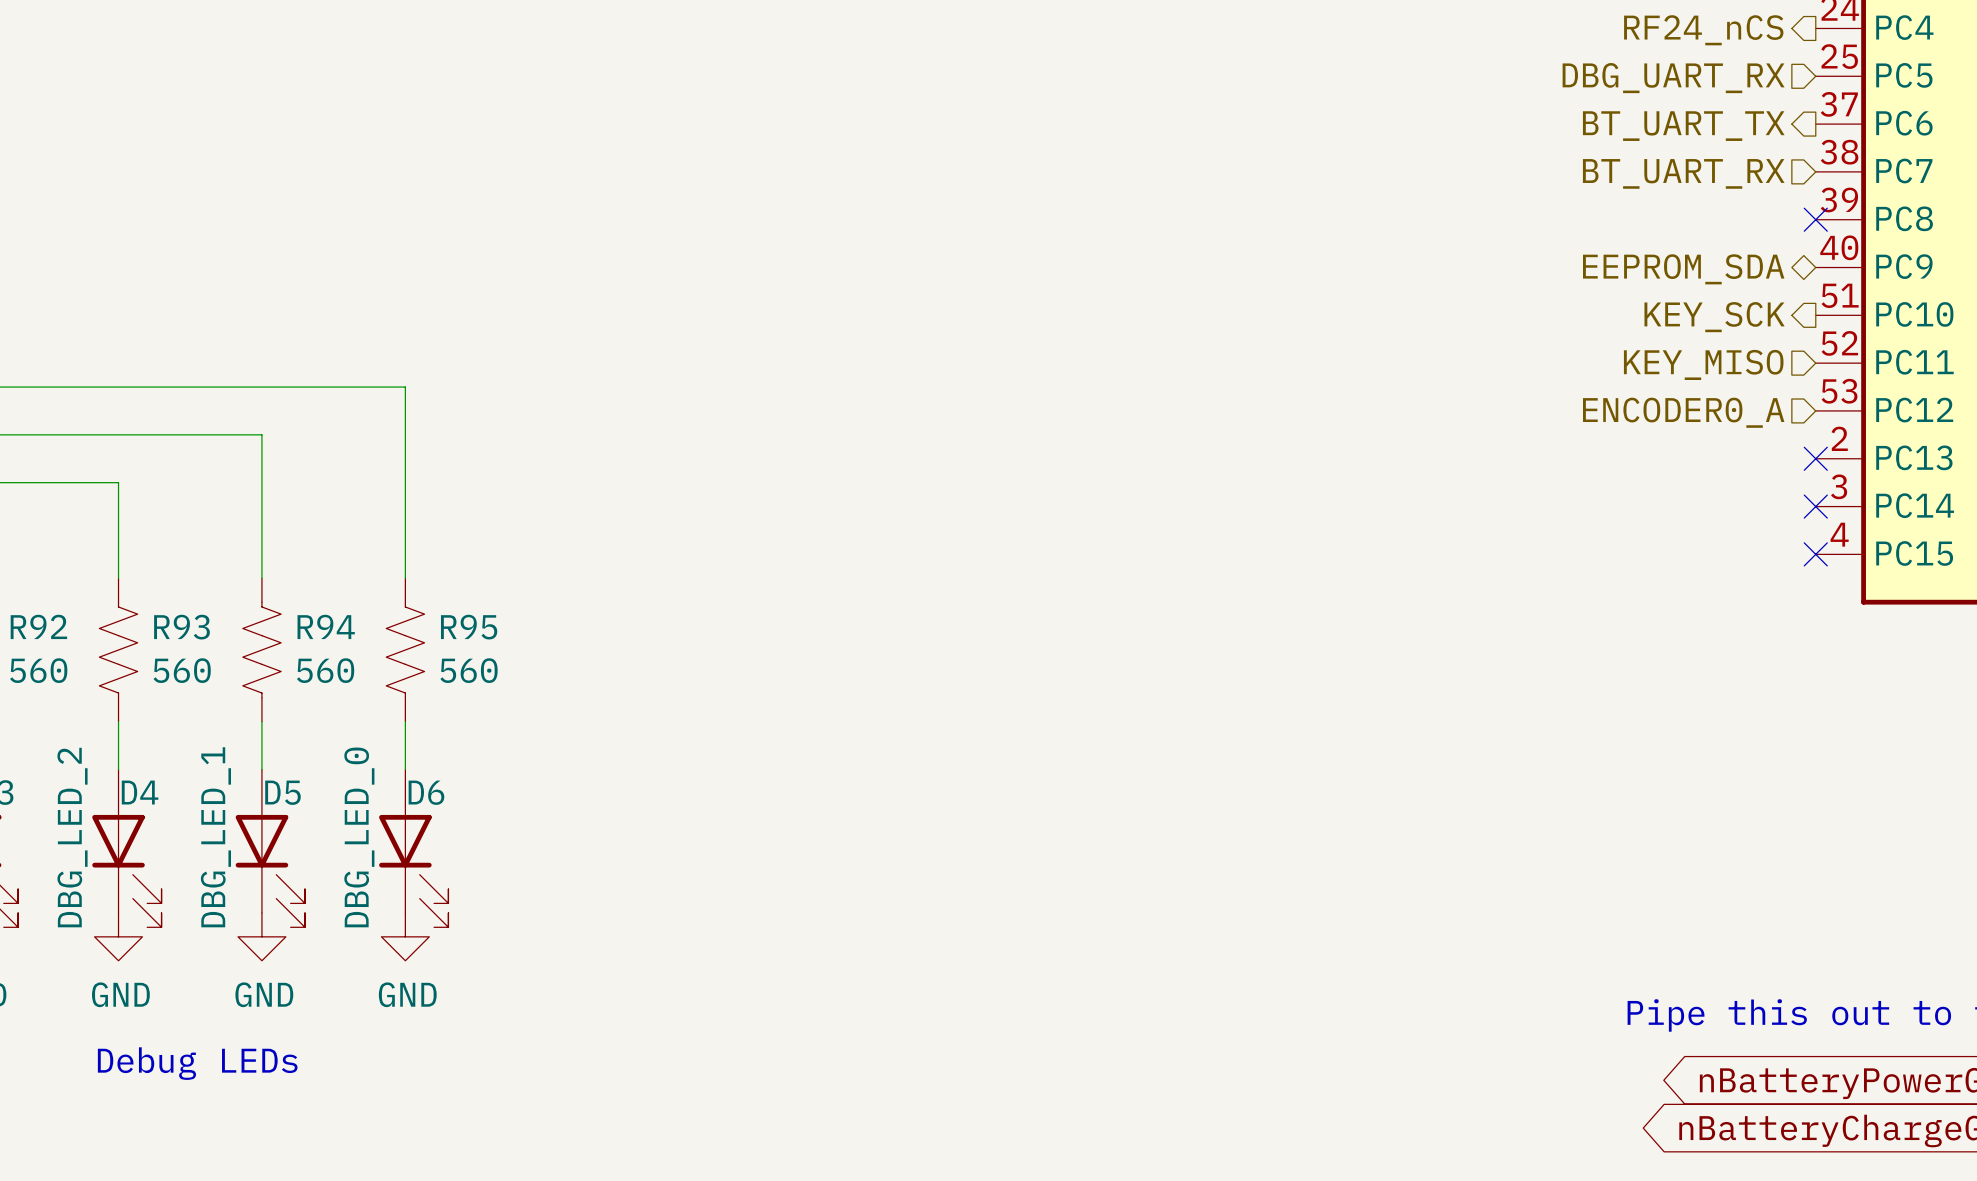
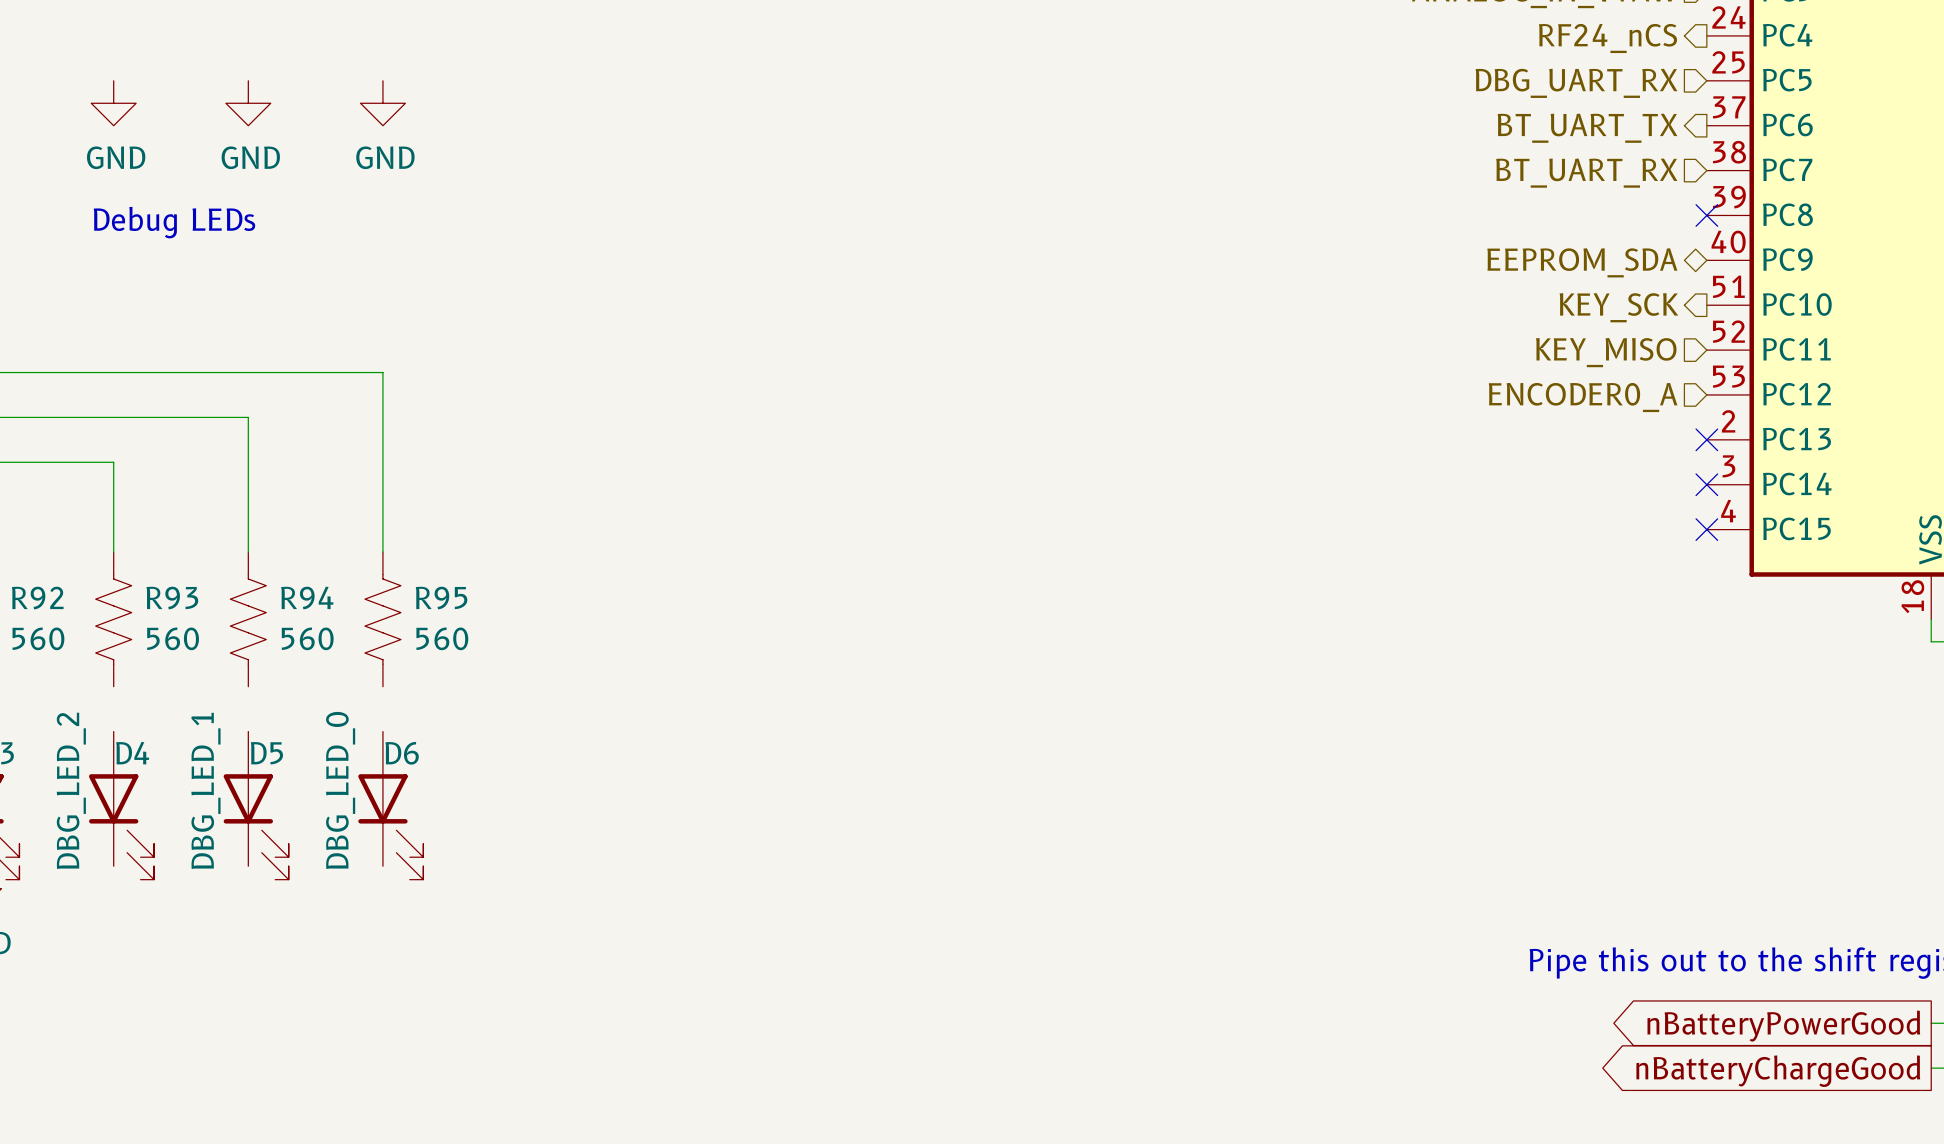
power symbol: none -> GND (113, 103)
power symbol: none -> GND (248, 103)
power symbol: none -> GND (382, 103)
text: none -> Debug LEDs (174, 222)
wire: (118, 721) (118, 769) -> none
wire: (261, 721) (261, 769) -> none
wire: (405, 721) (405, 769) -> none
power symbol: GND (118, 936) -> none
power symbol: GND (261, 936) -> none
power symbol: GND (405, 936) -> none
text: Debug LEDs (197, 1063) -> none

